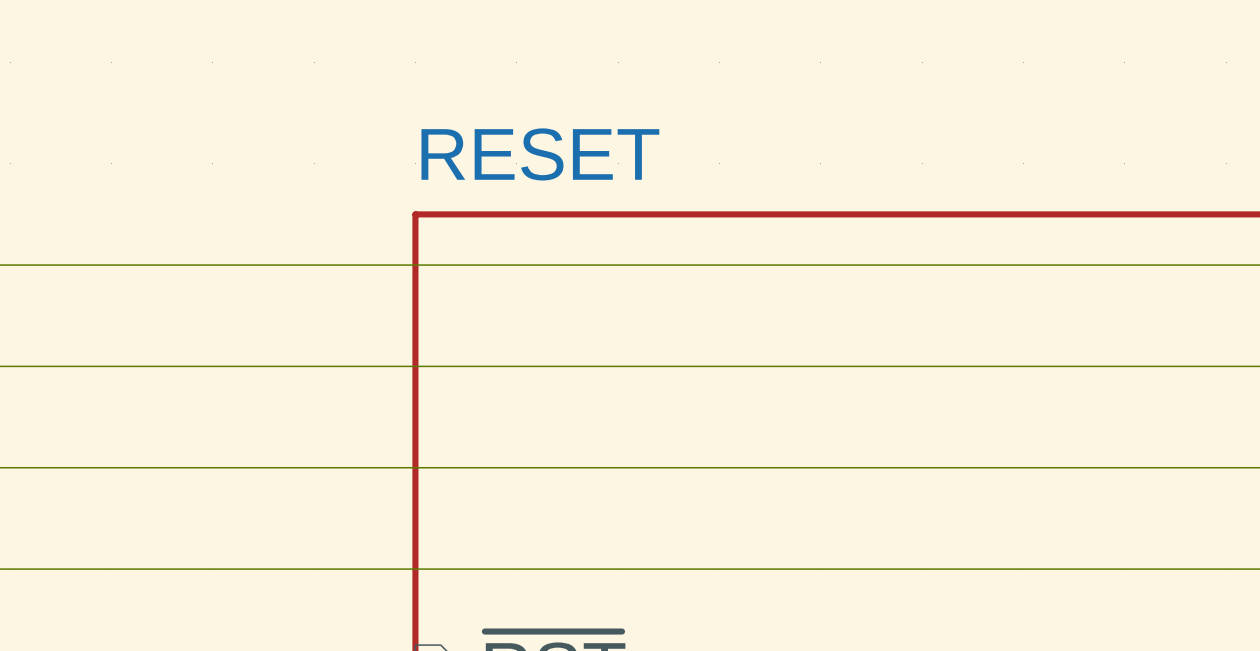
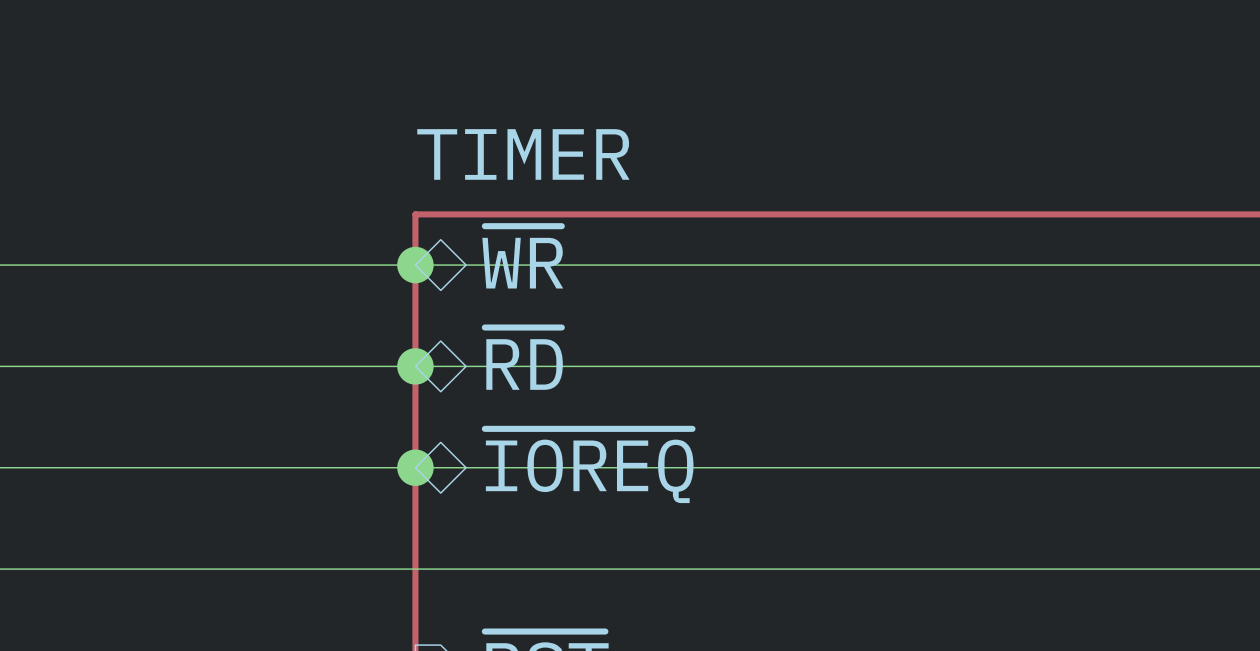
sheet RESET name: RESET (540, 154) -> TIMER (523, 154)
sheet pin: none -> ~{WR} (522, 257)
junction: none -> (415, 265)
sheet pin: none -> ~{RD} (523, 358)
junction: none -> (415, 366)
sheet pin: none -> ~{IOREQ} (589, 465)
junction: none -> (415, 467)

